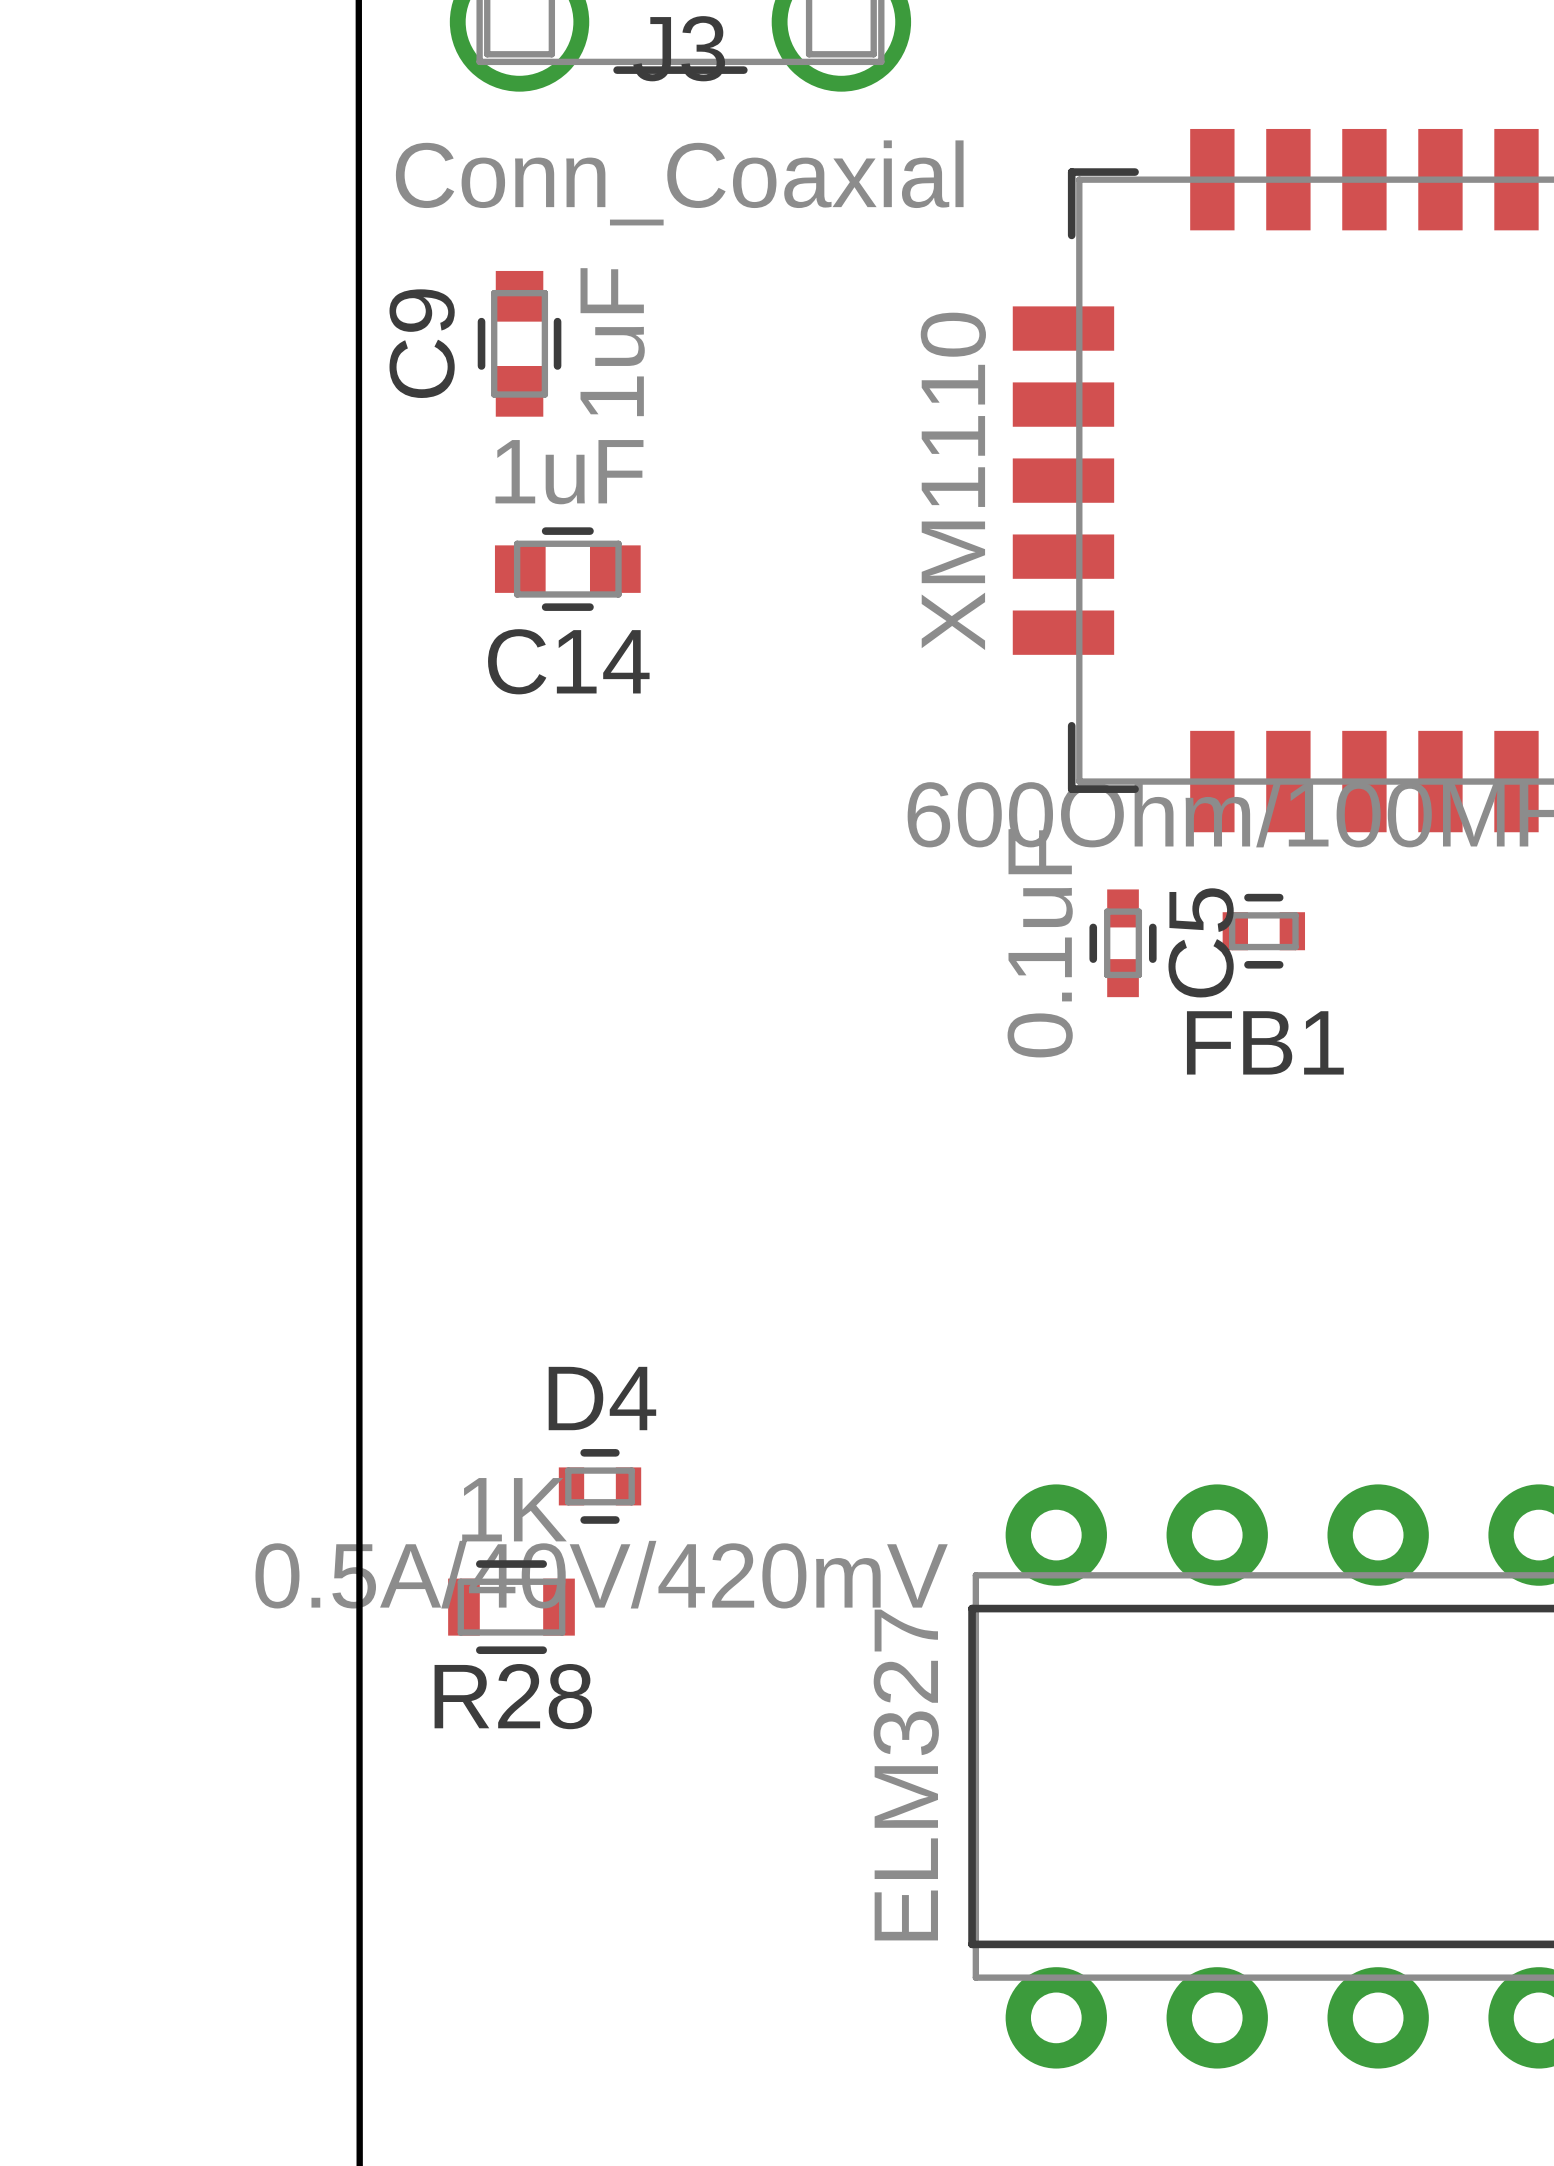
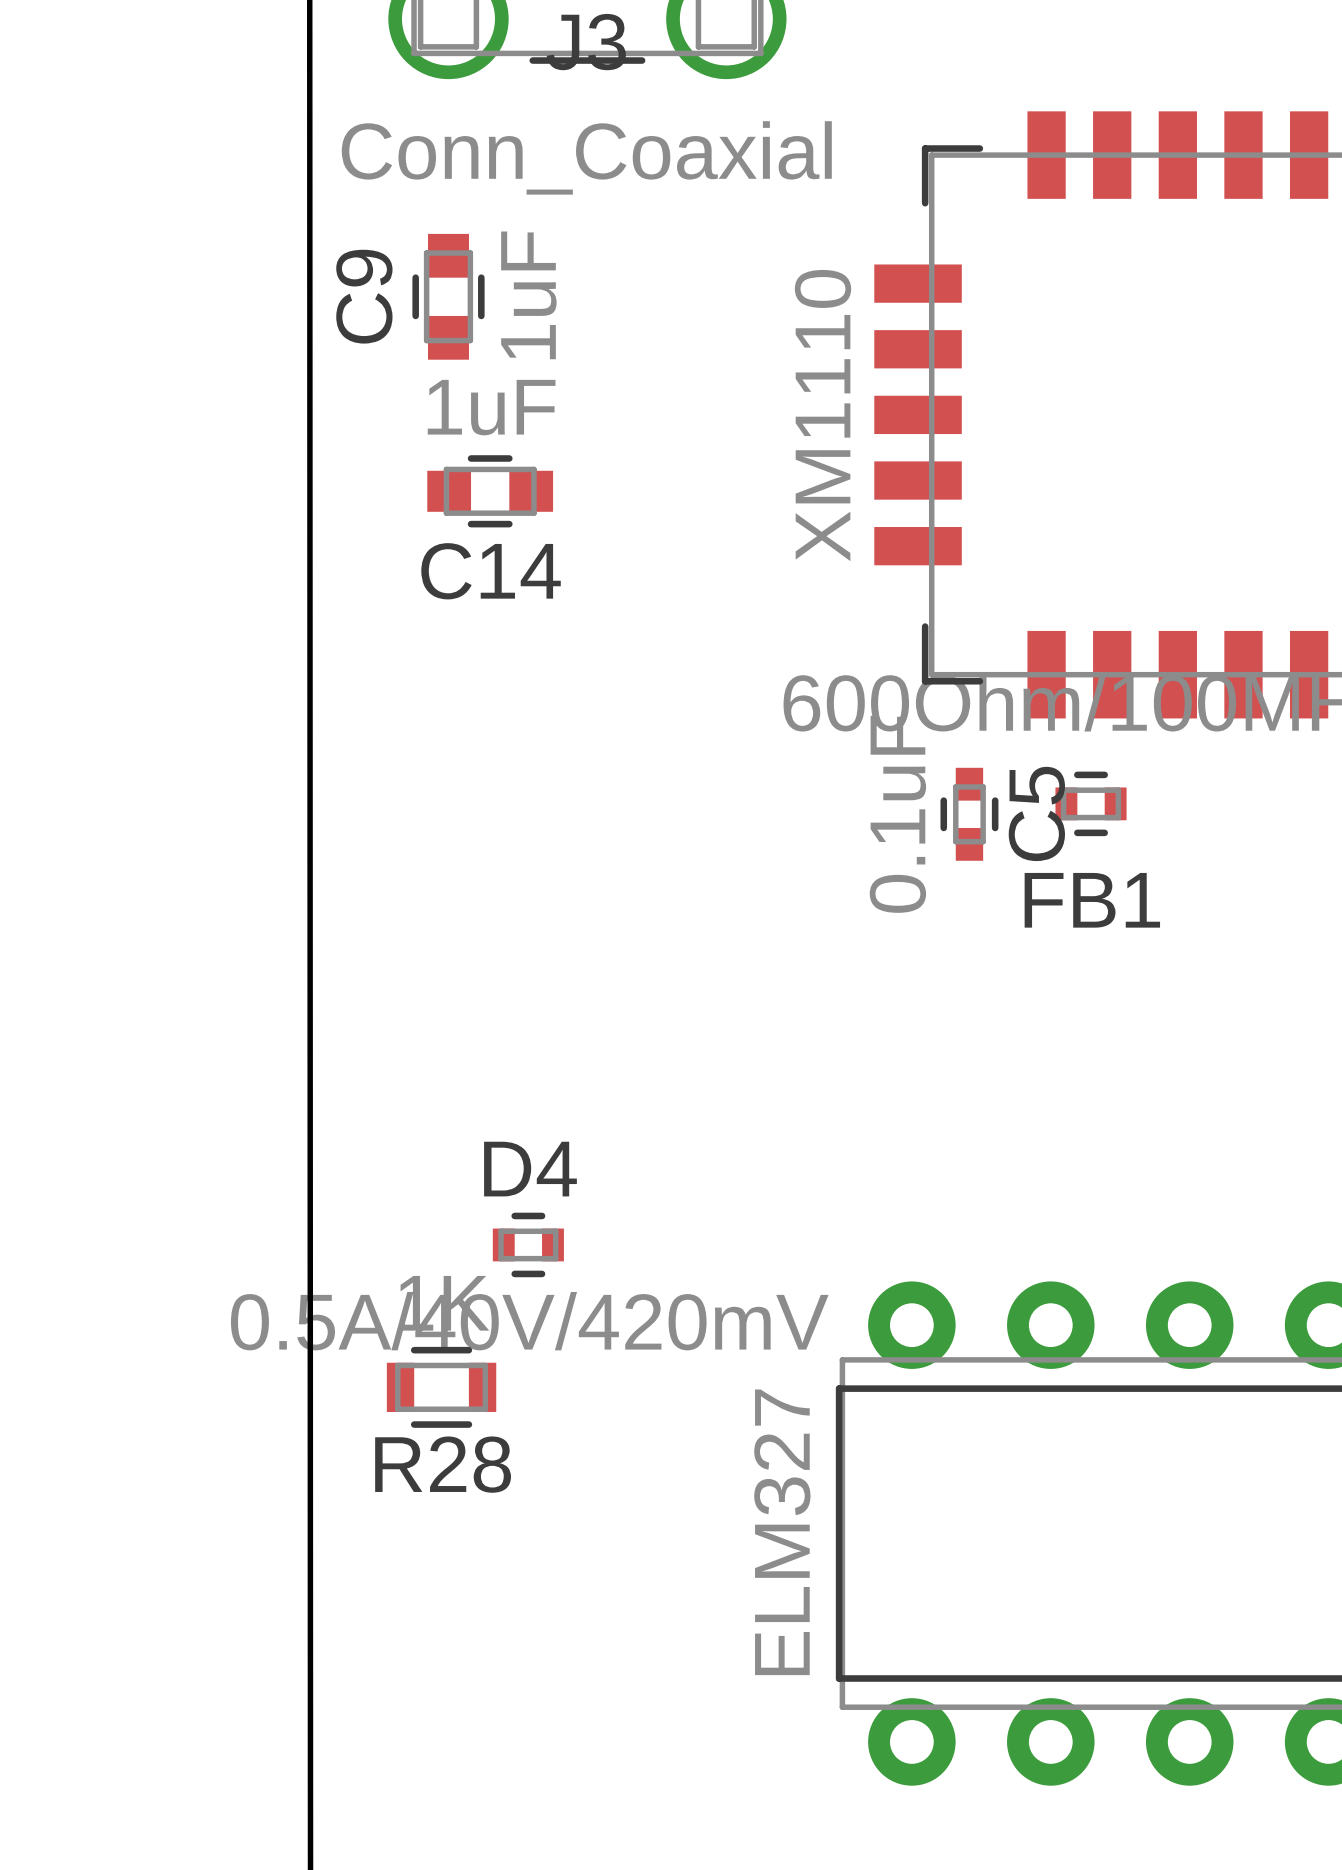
D4 position: (600, 1486) -> (528, 1244)

